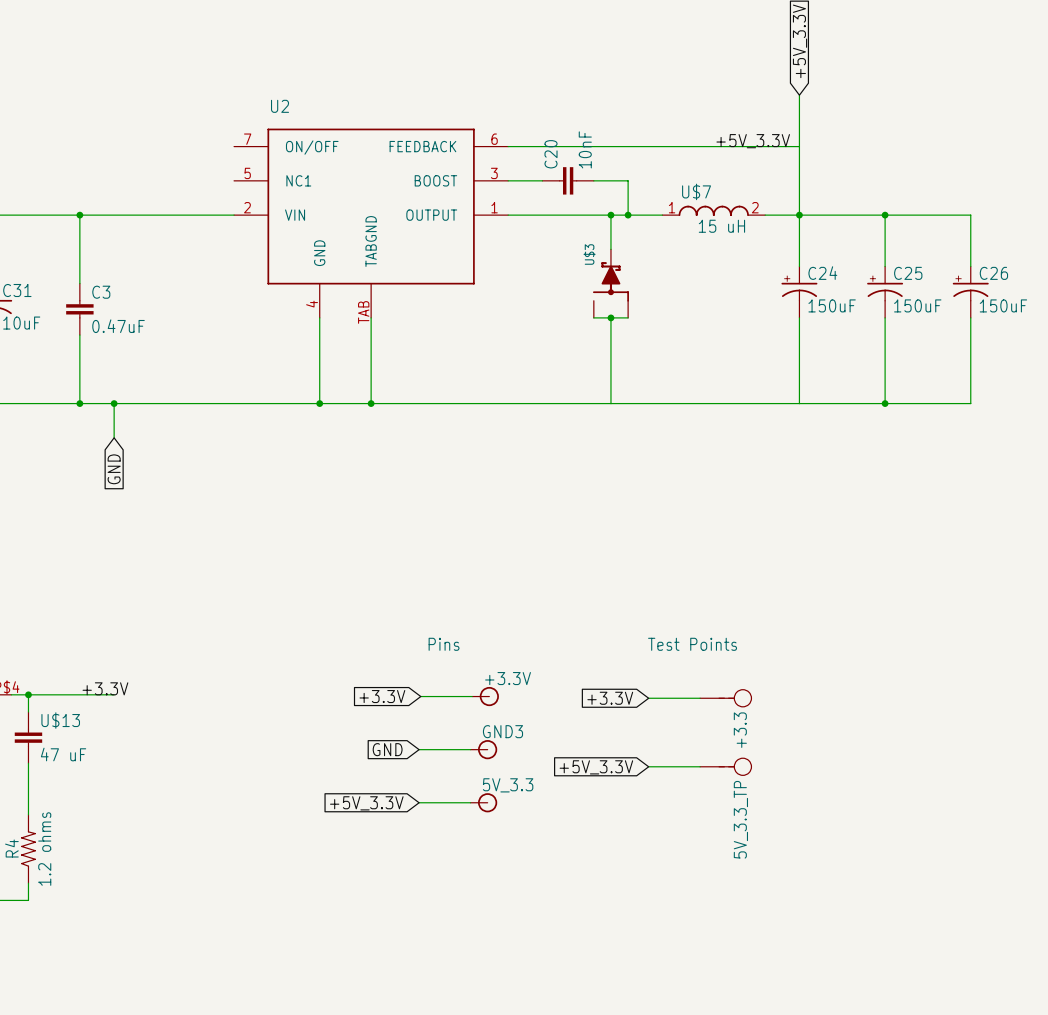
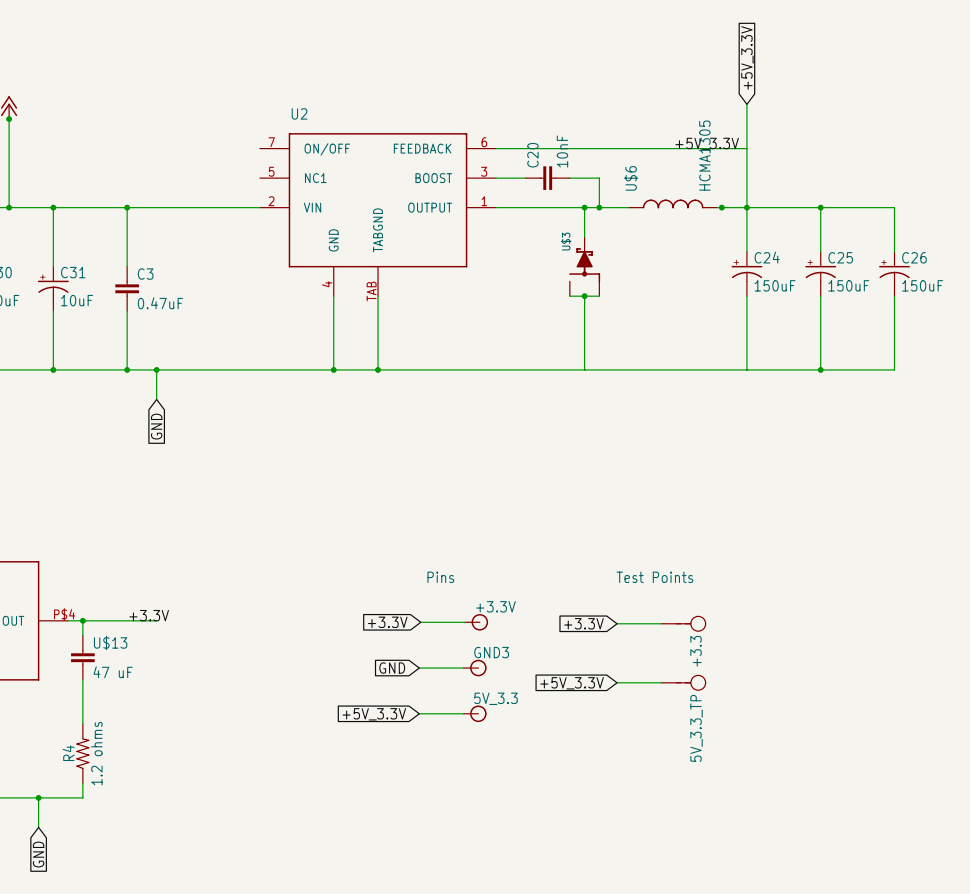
U$7 value: none -> HCMA1305 (704, 155)
U$7 name: U$7 (696, 191) -> U$6 (631, 178)
U$7 pin number: 1 (672, 207) -> none
U$7 pin number: 2 (755, 207) -> none
junction: none -> (721, 207)
U$7 text: 15 uH (721, 226) -> none

